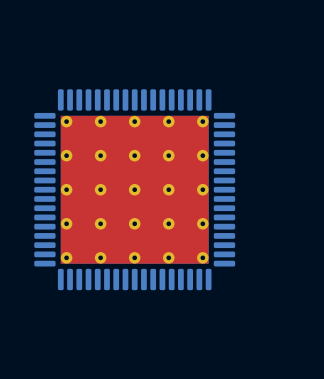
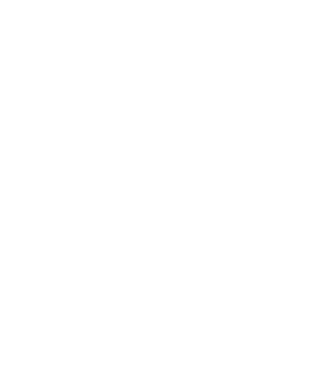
part: (134, 189) -> none

